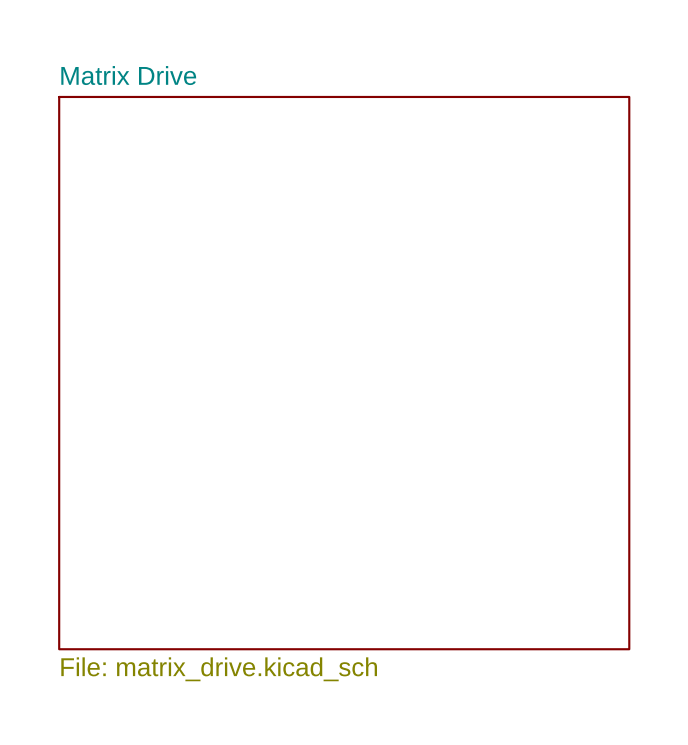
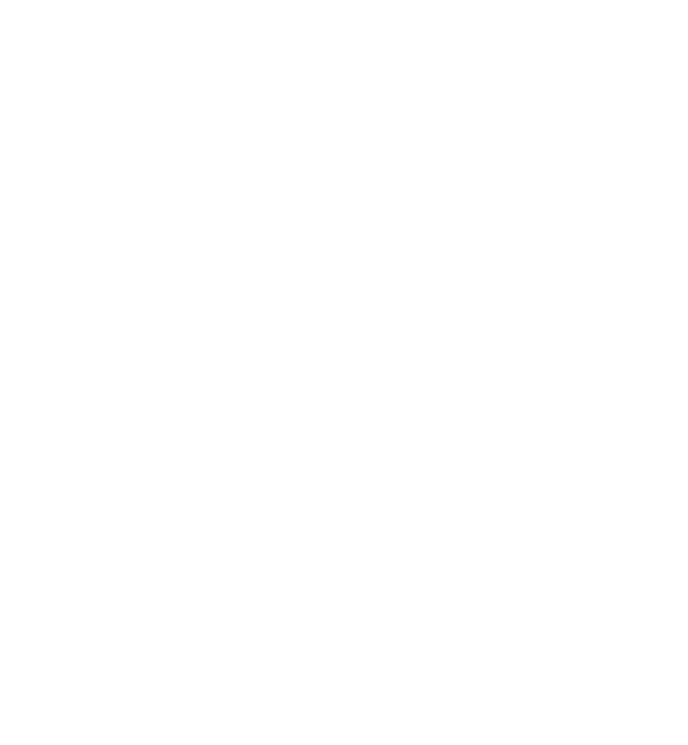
sheet Matrix Drive: File: matrix_drive.kicad_sch (344, 373) -> none

